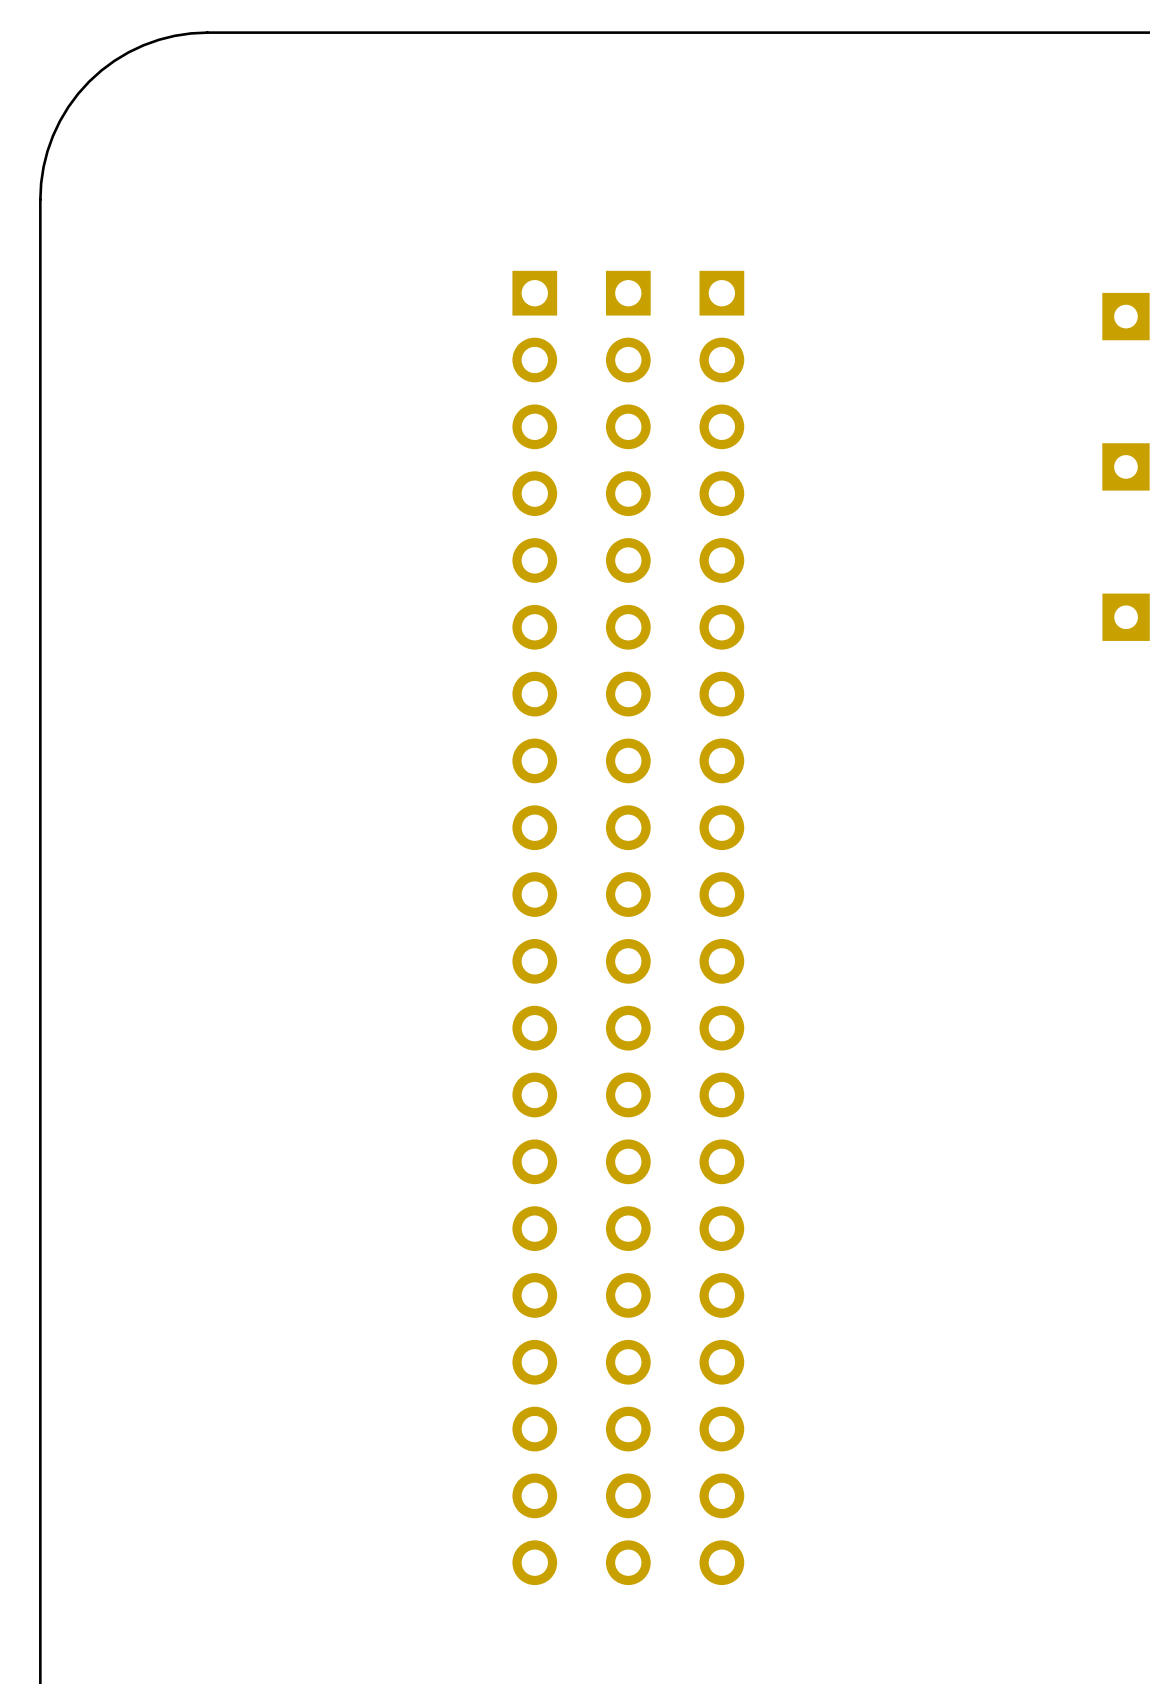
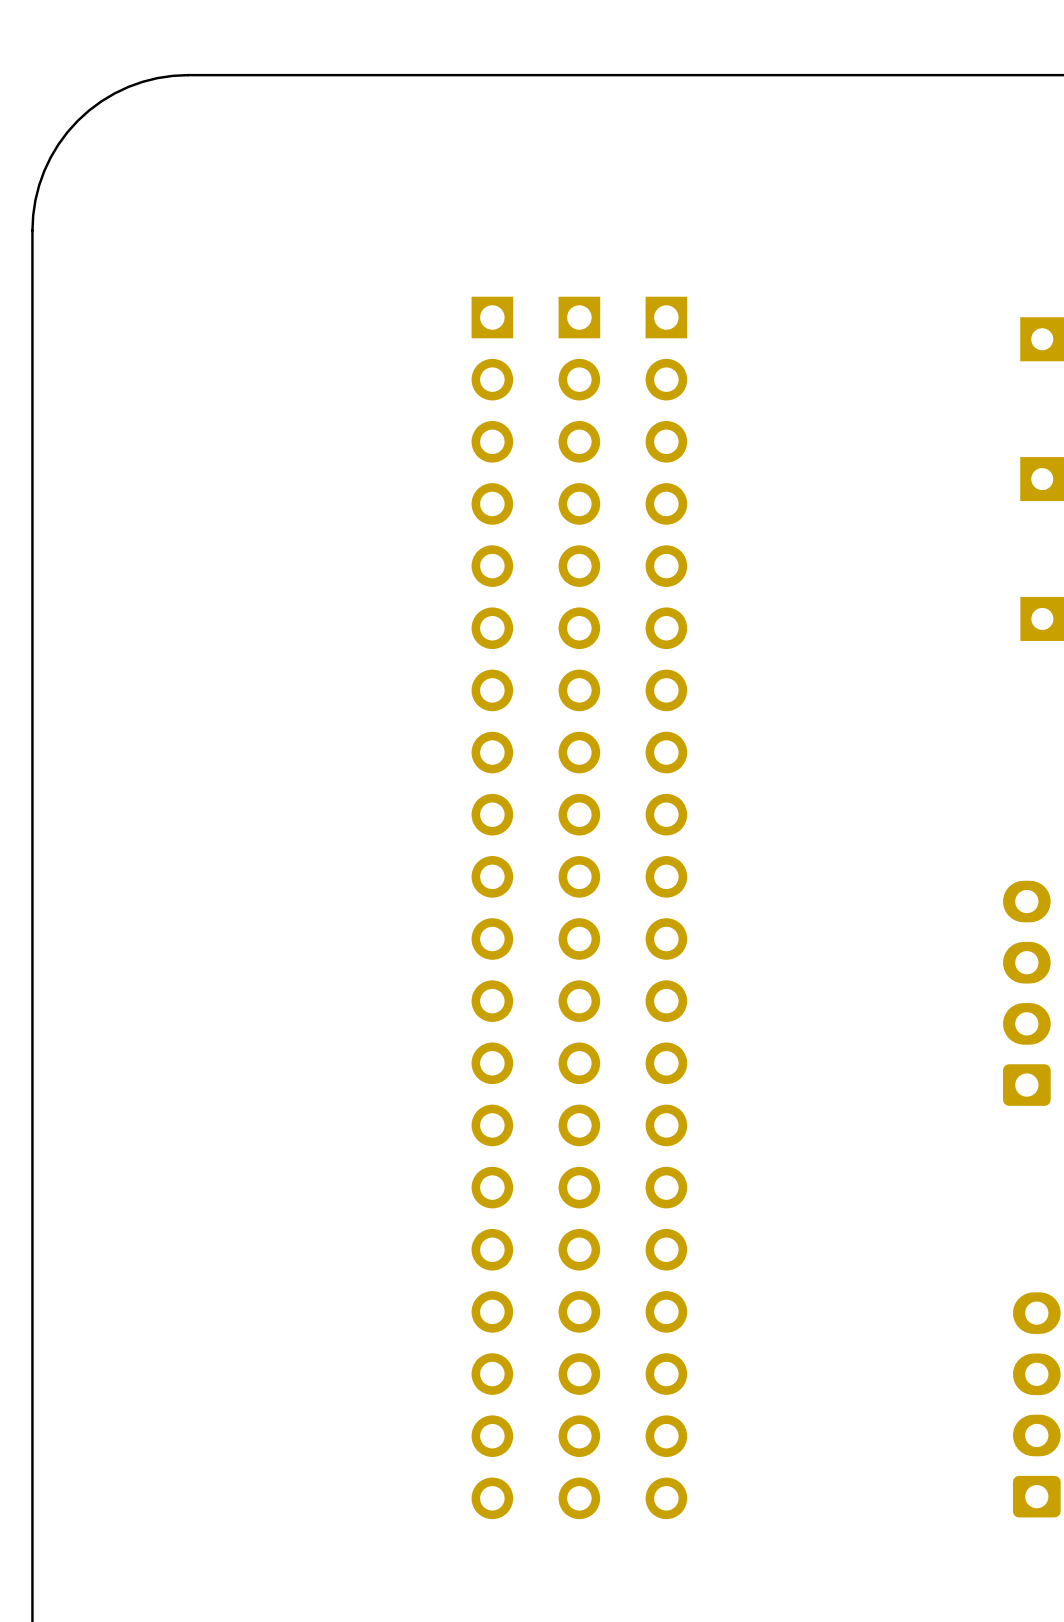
part: none -> (1026, 993)
part: none -> (1036, 1404)

